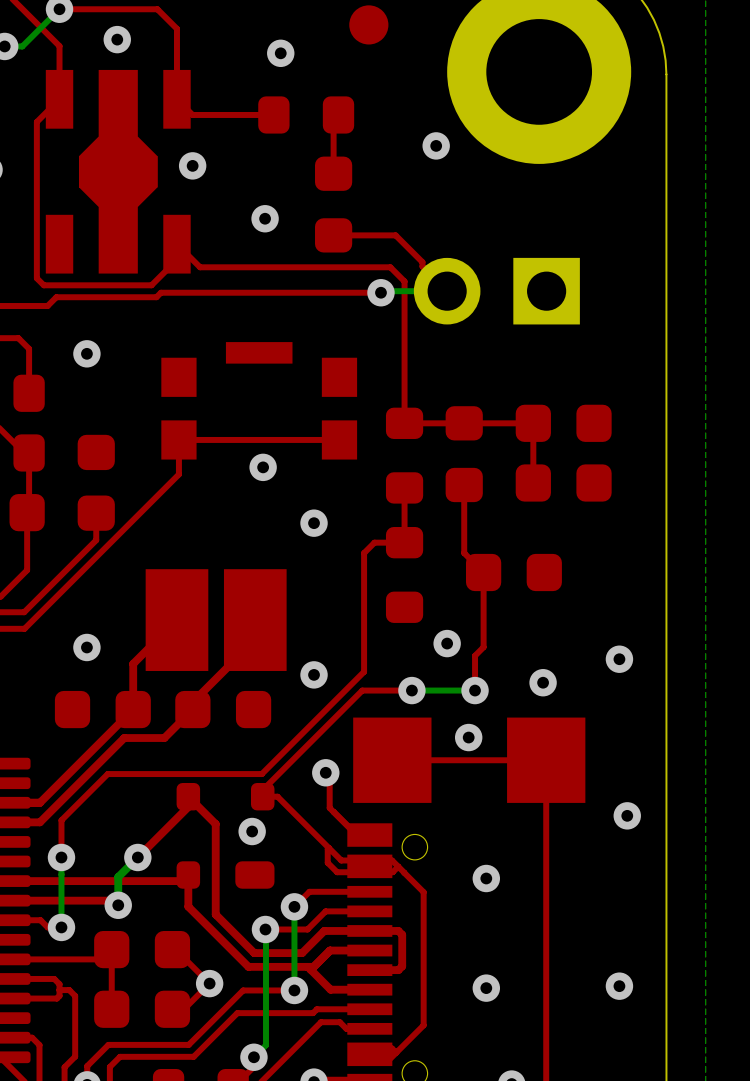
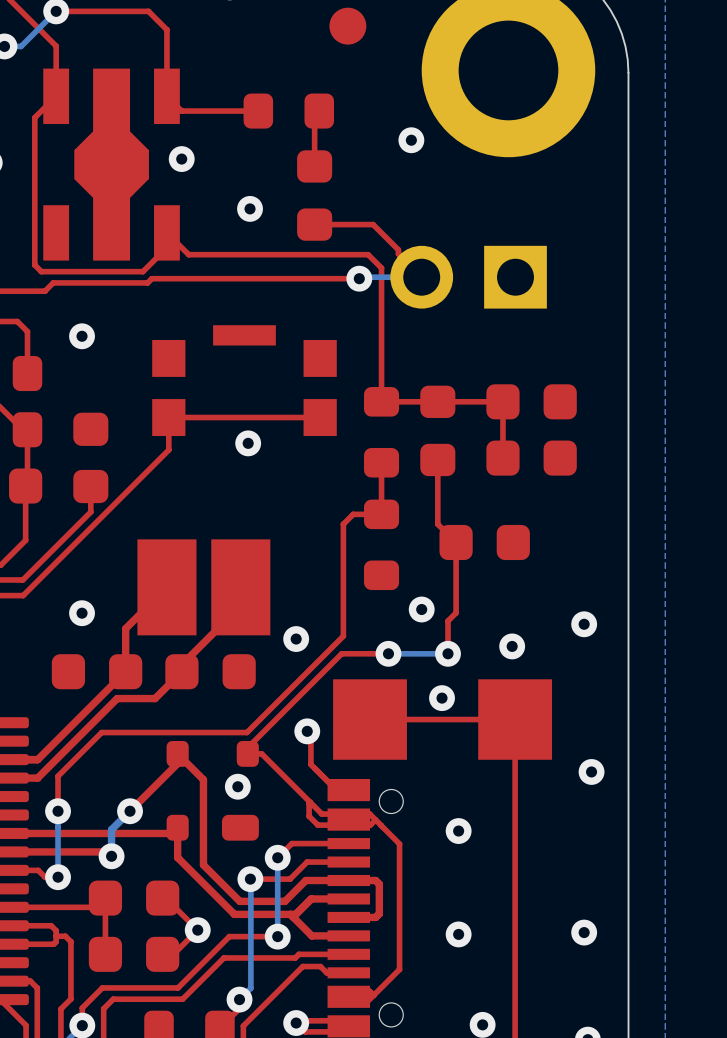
via: (117, 39) -> none
via: (280, 53) -> none
via: (314, 523) -> none

